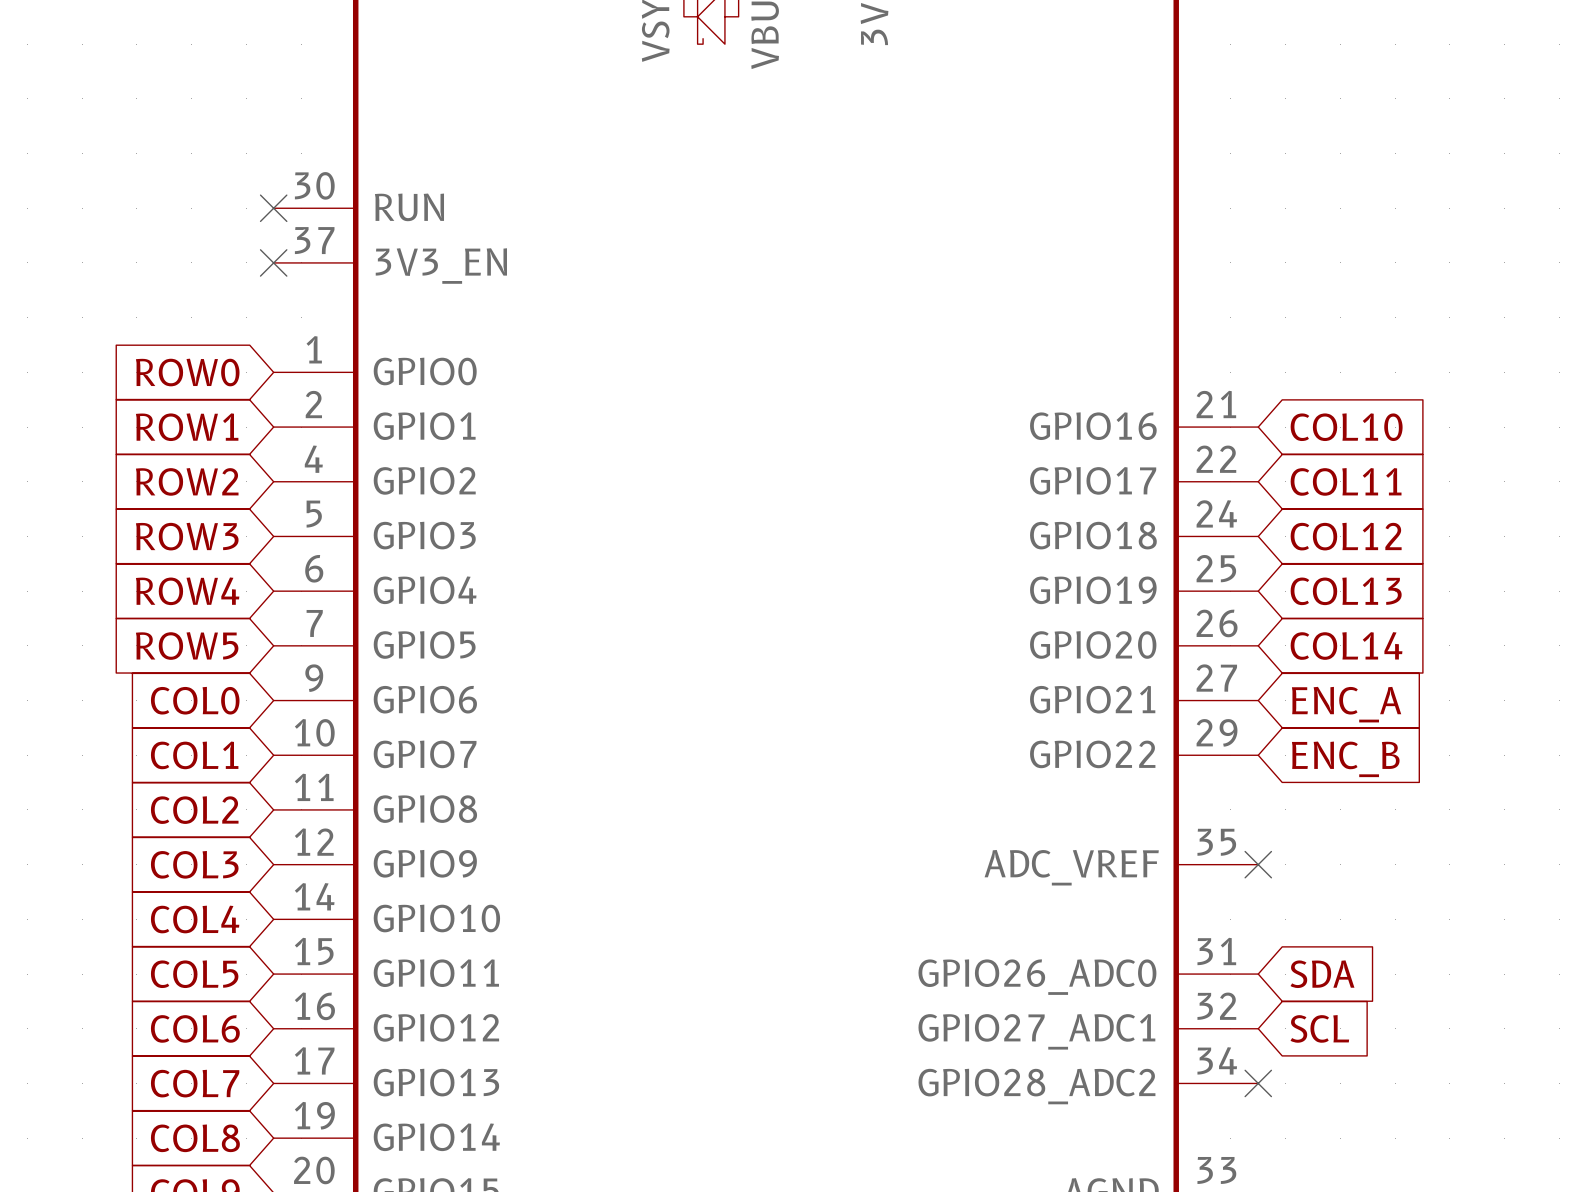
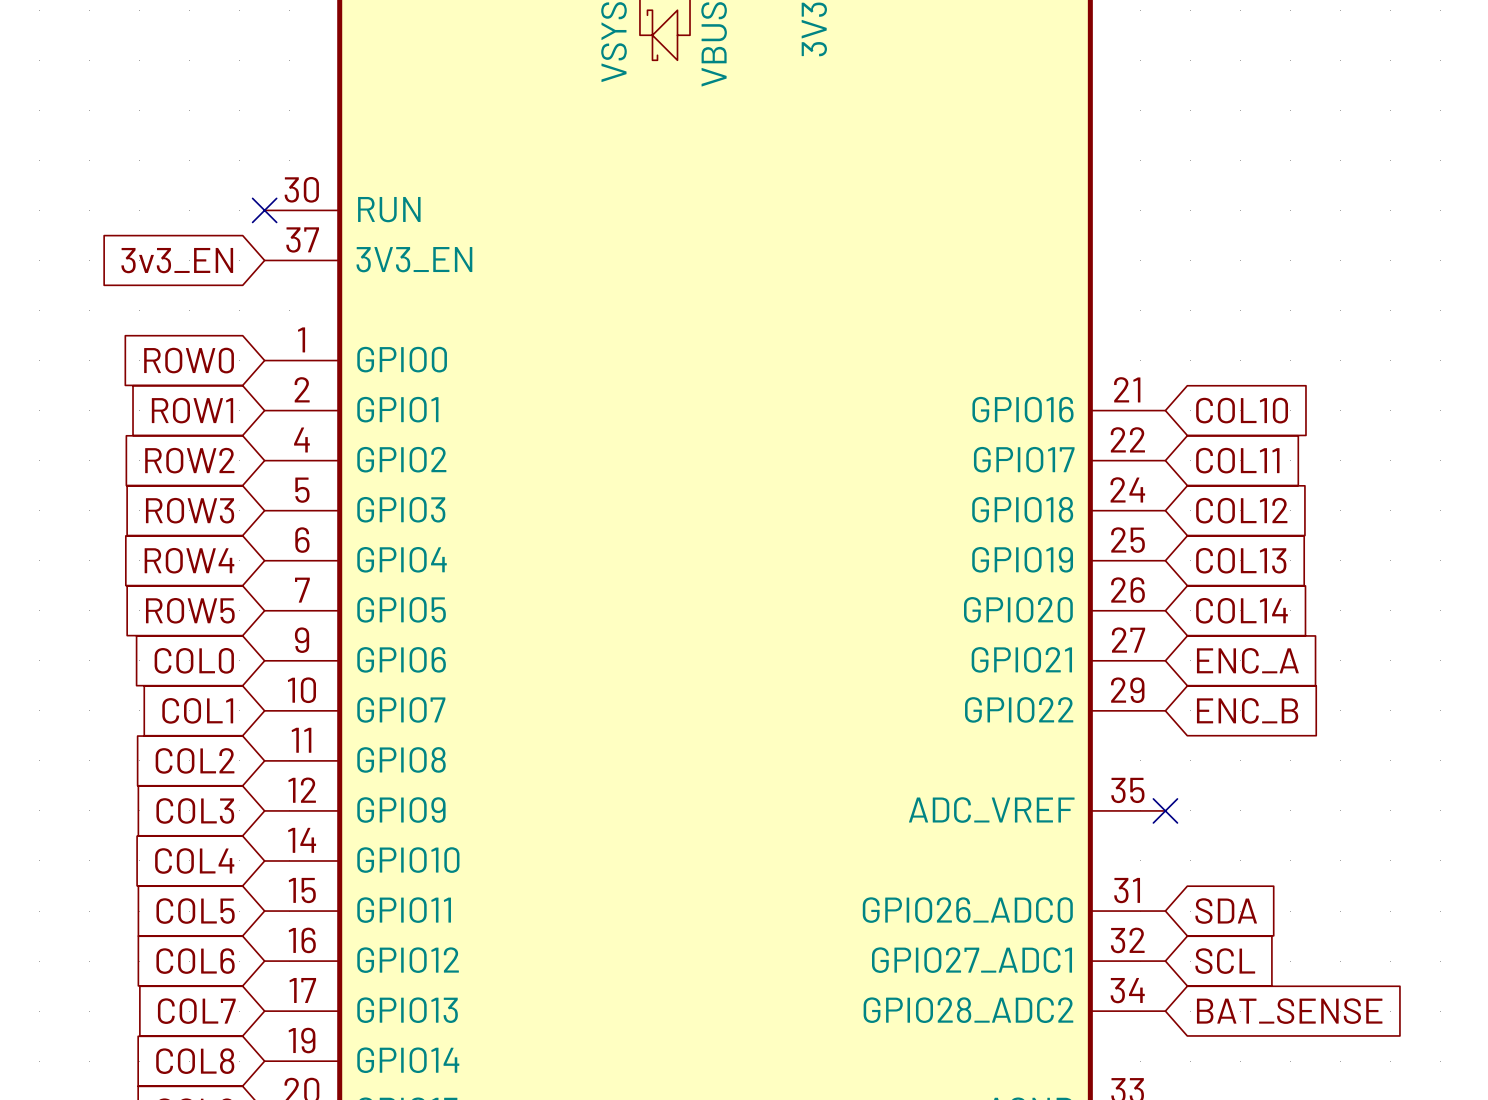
no-connect mark: (273, 262) -> none
global label: none -> 3v3_EN (177, 260)
no-connect mark: (1258, 1083) -> none
global label: none -> BAT_SENSE (1289, 1011)

